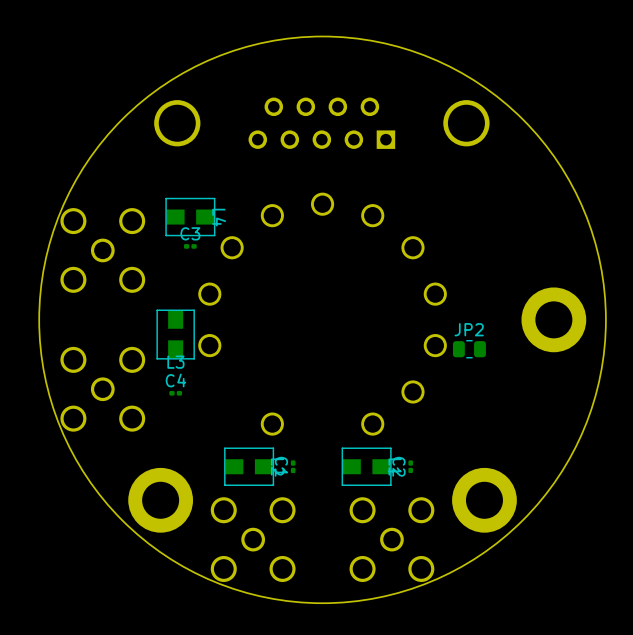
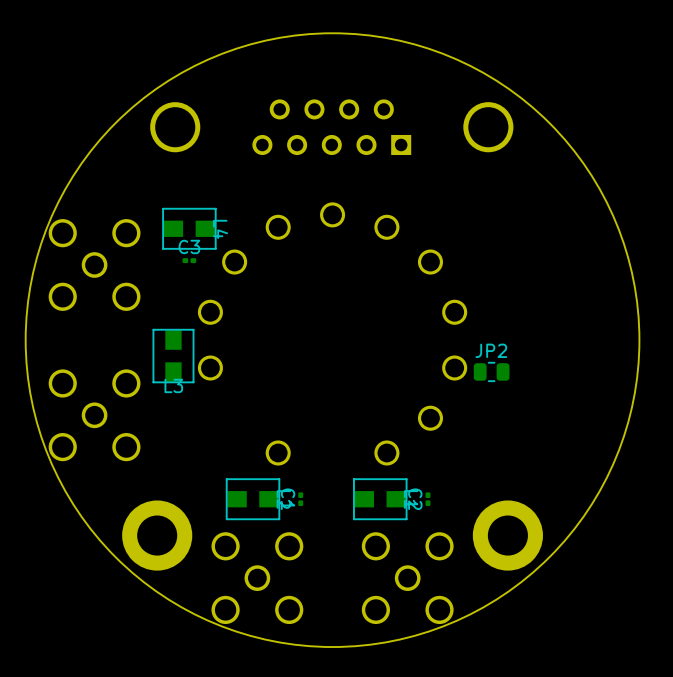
part: (553, 319) -> none
C4: (175, 393) -> none

